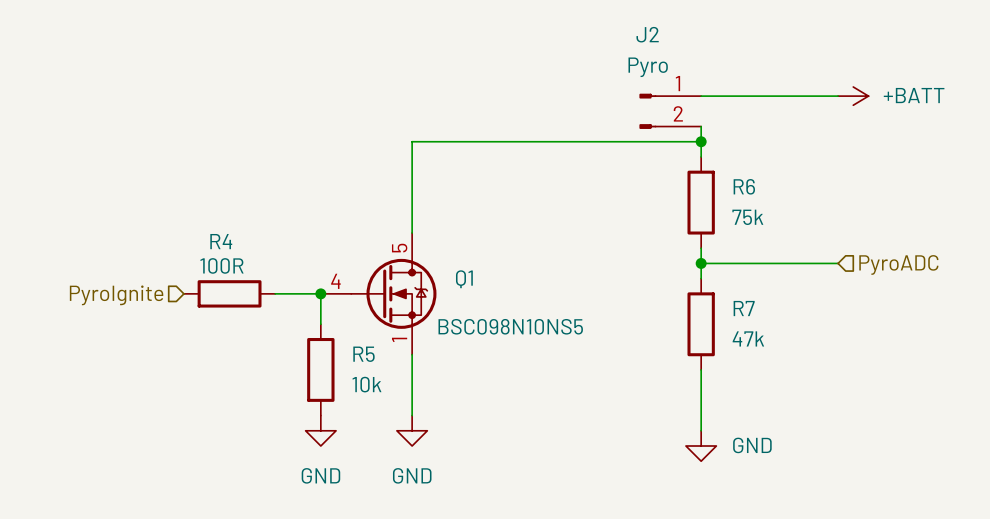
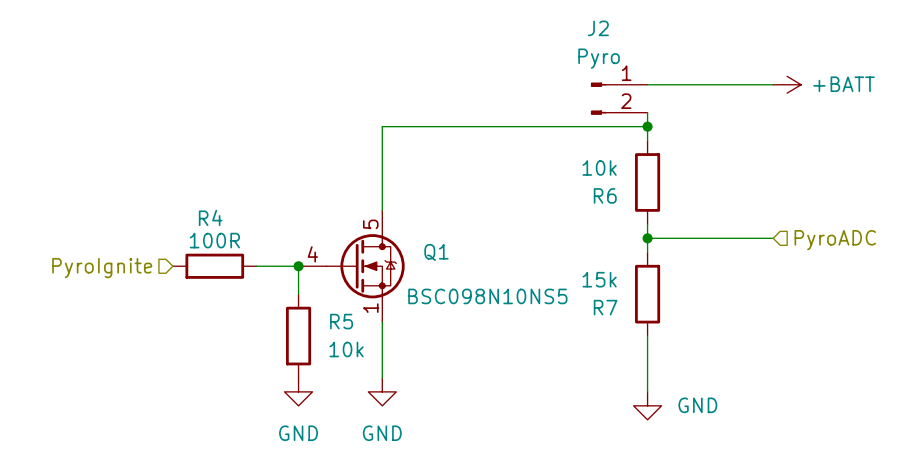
R6 name position: R6 (744, 186) -> R6 (605, 195)
R6 value: 75k (747, 217) -> 10k (599, 168)
R7 name position: R7 (744, 308) -> R7 (605, 307)
R7 value: 47k (748, 338) -> 15k (599, 279)

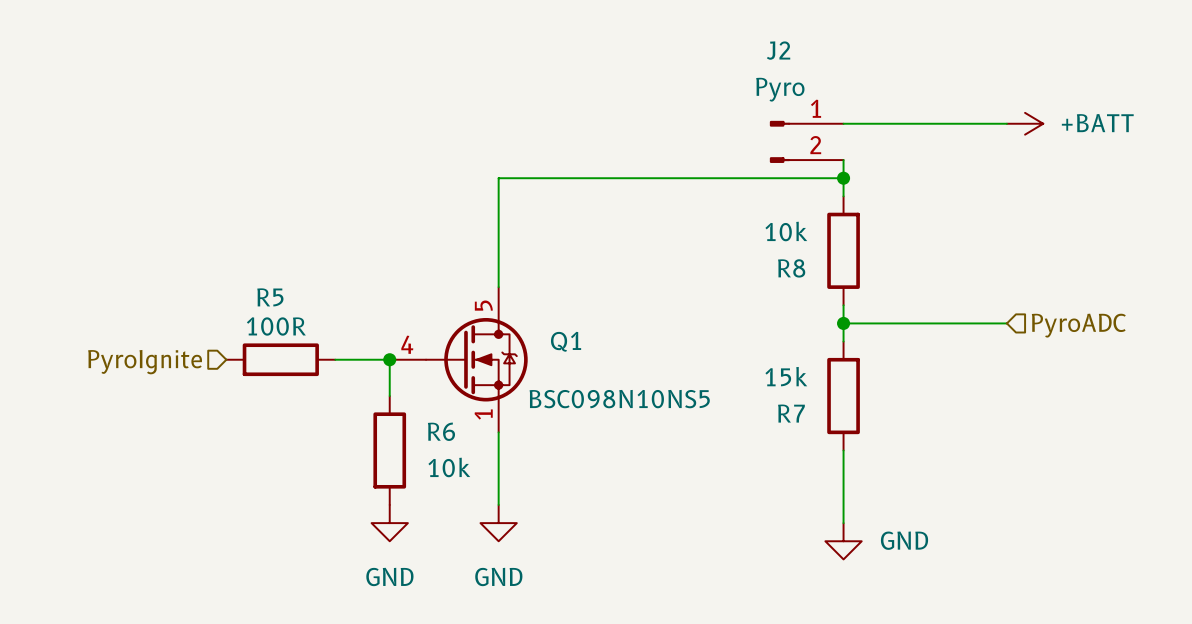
R6 name: R6 (605, 195) -> R8 (791, 268)
R4 name: R4 (210, 217) -> R5 (270, 297)
R5 name: R5 (341, 321) -> R6 (441, 431)

